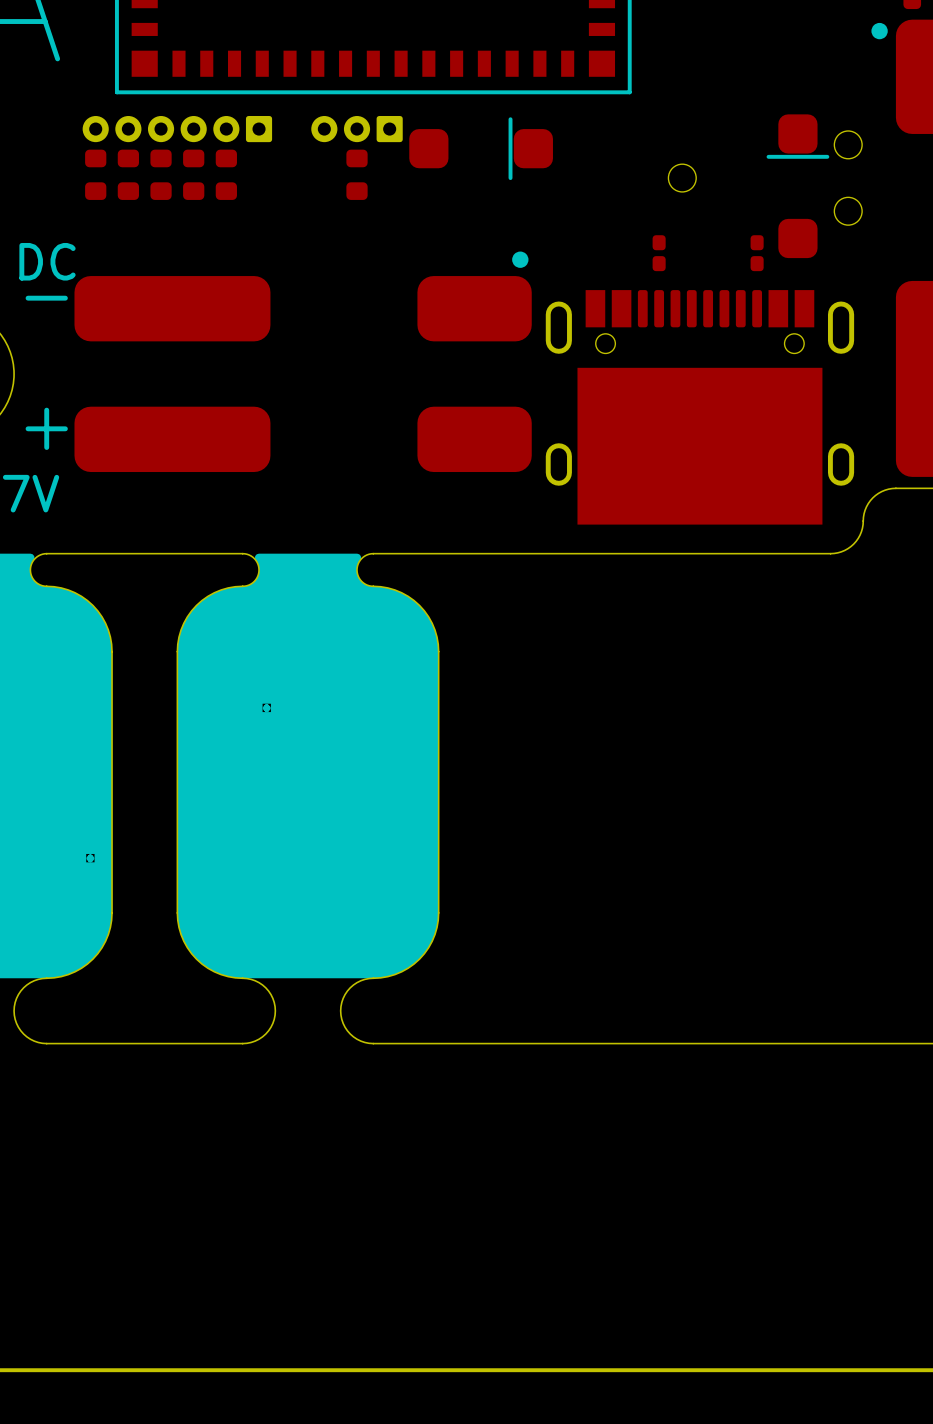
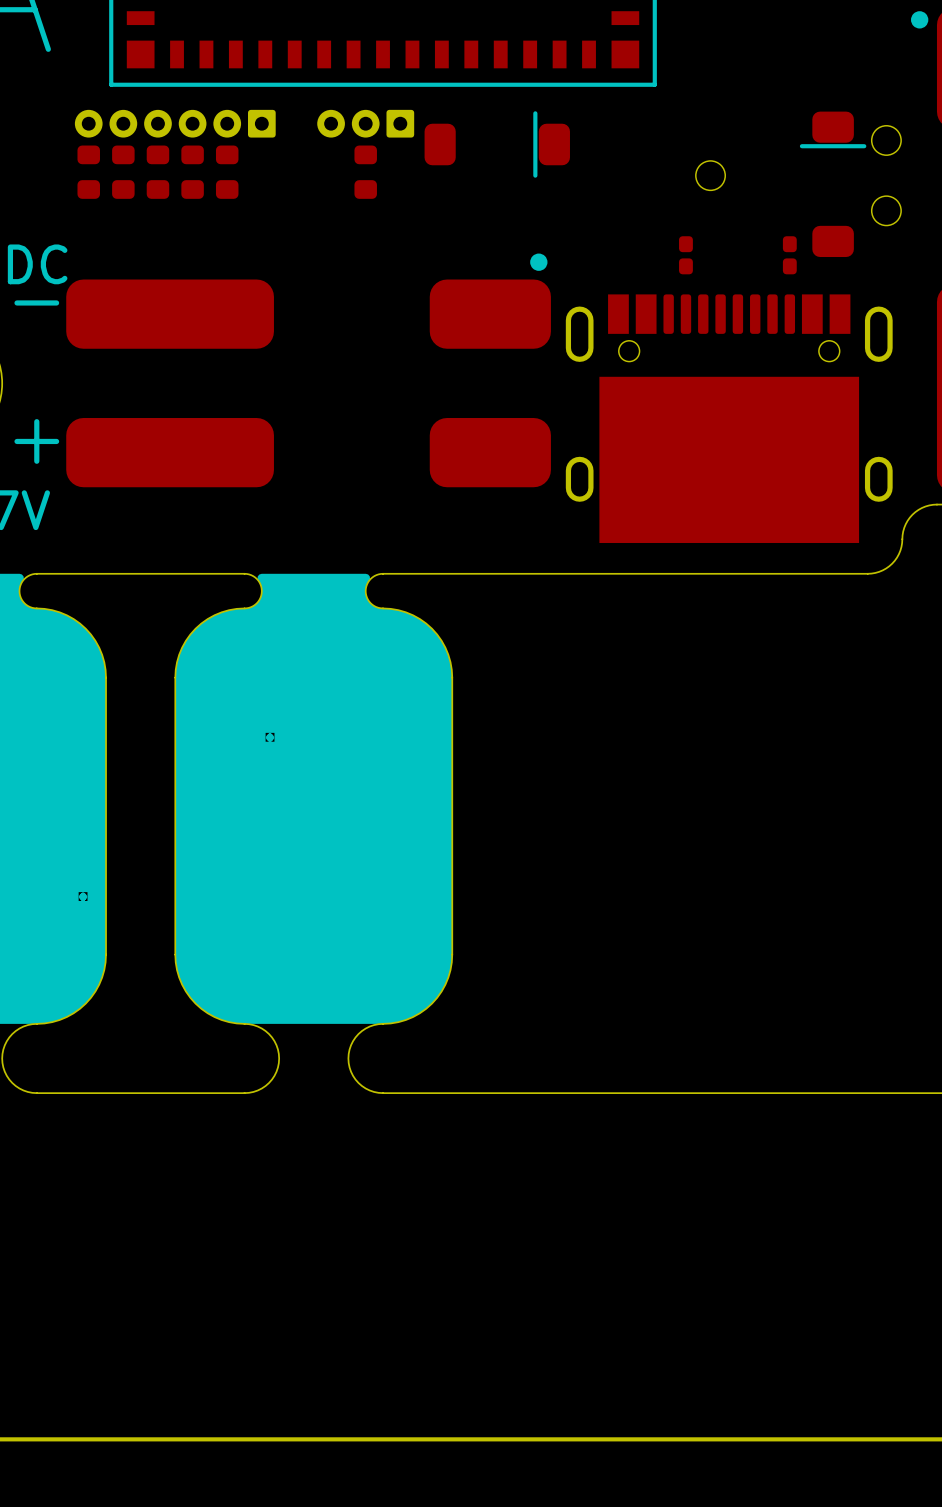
part footprint: [766, 114, 830, 259] -> [799, 111, 867, 258]
part footprint: [409, 117, 553, 181] -> [424, 111, 570, 178]

